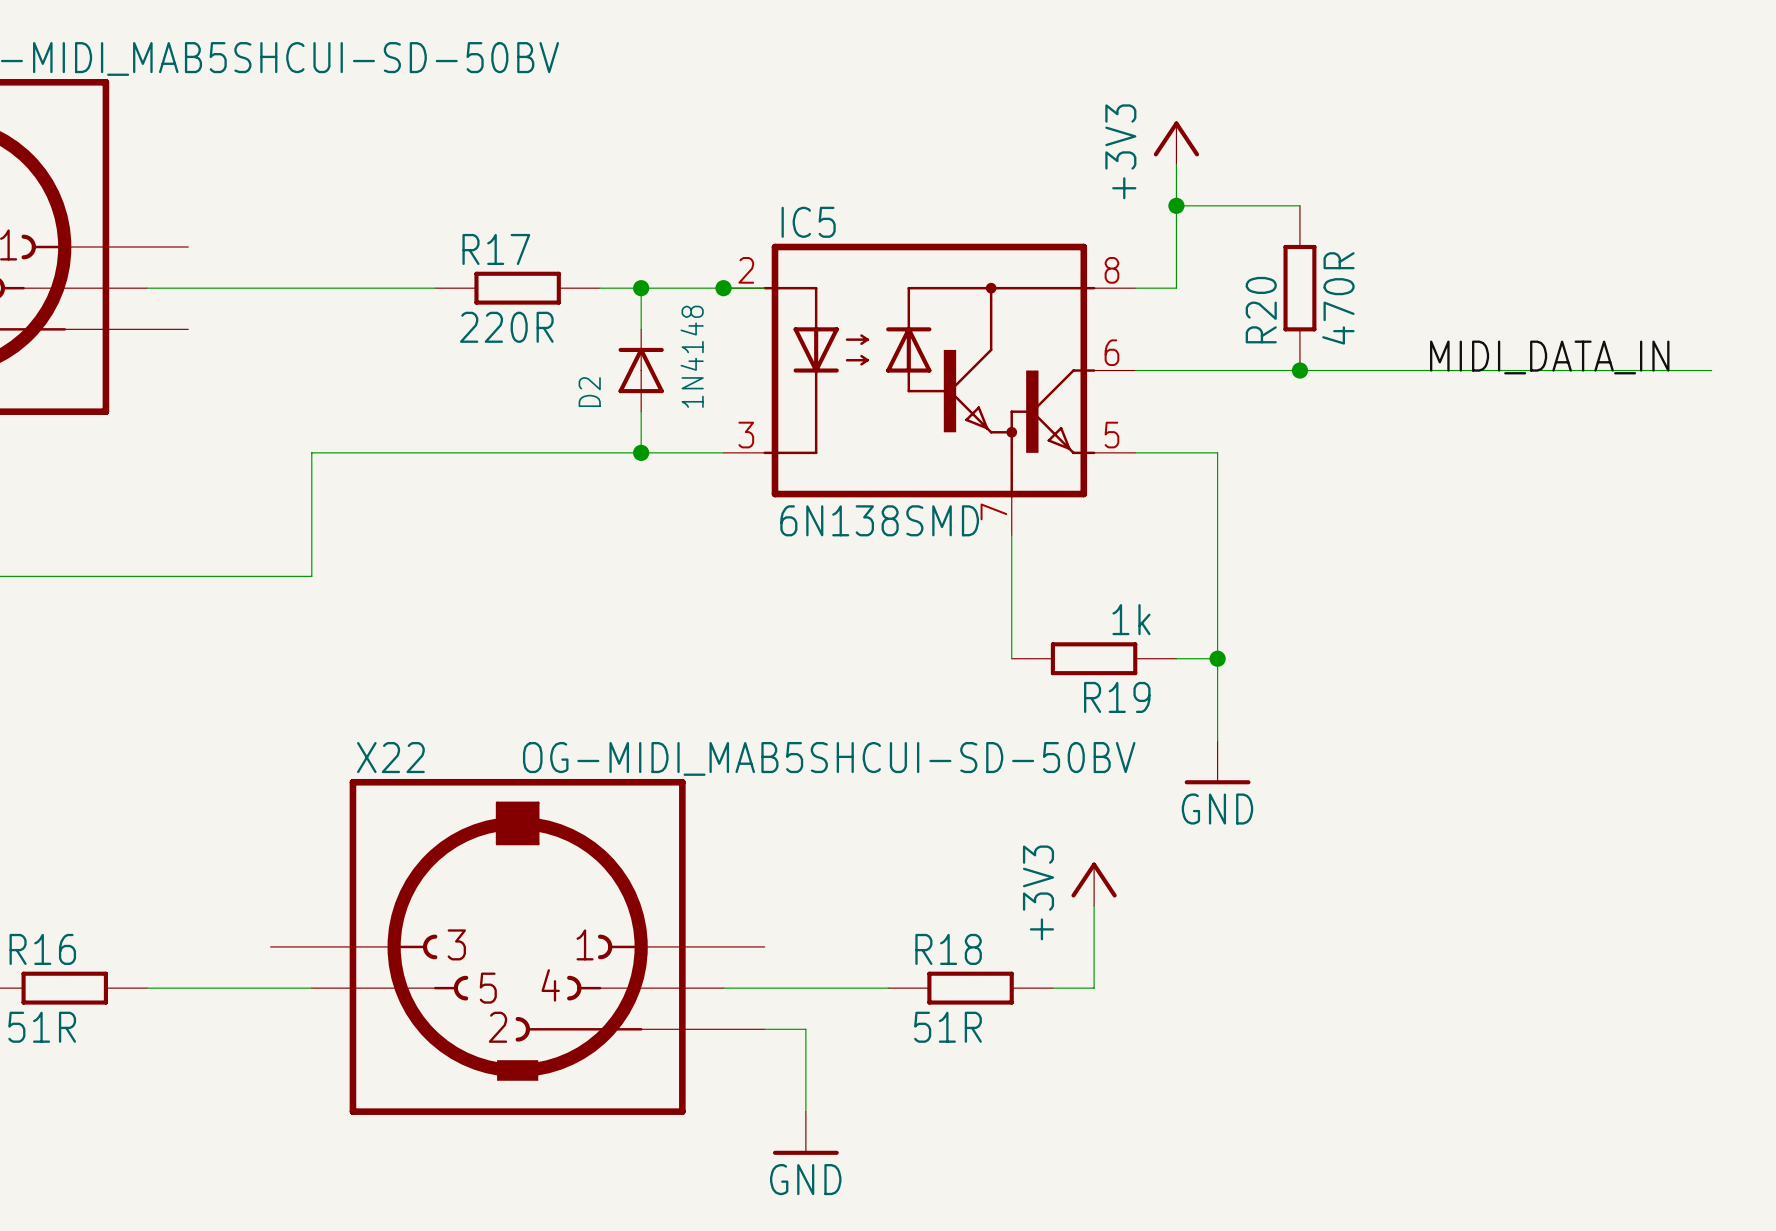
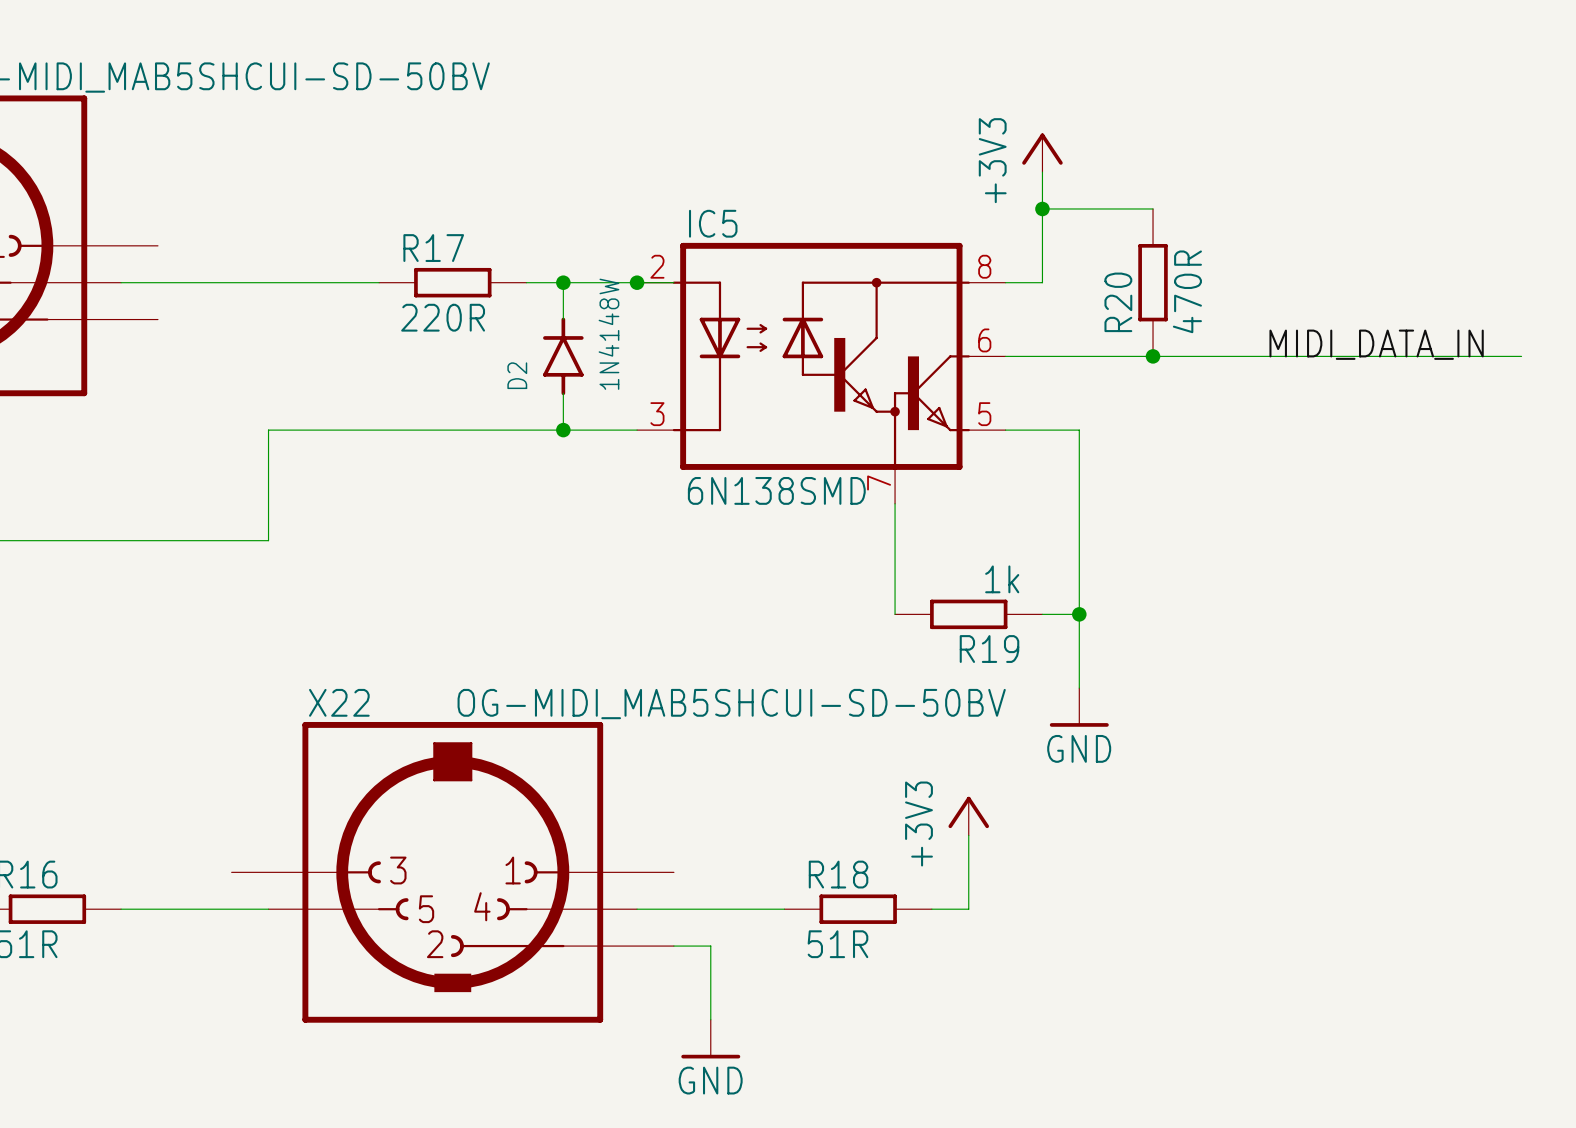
D2 symbol: [618, 329, 664, 412] -> [543, 317, 584, 396]
D2 value: 1N4148 (692, 356) -> 1N4148W (608, 334)

